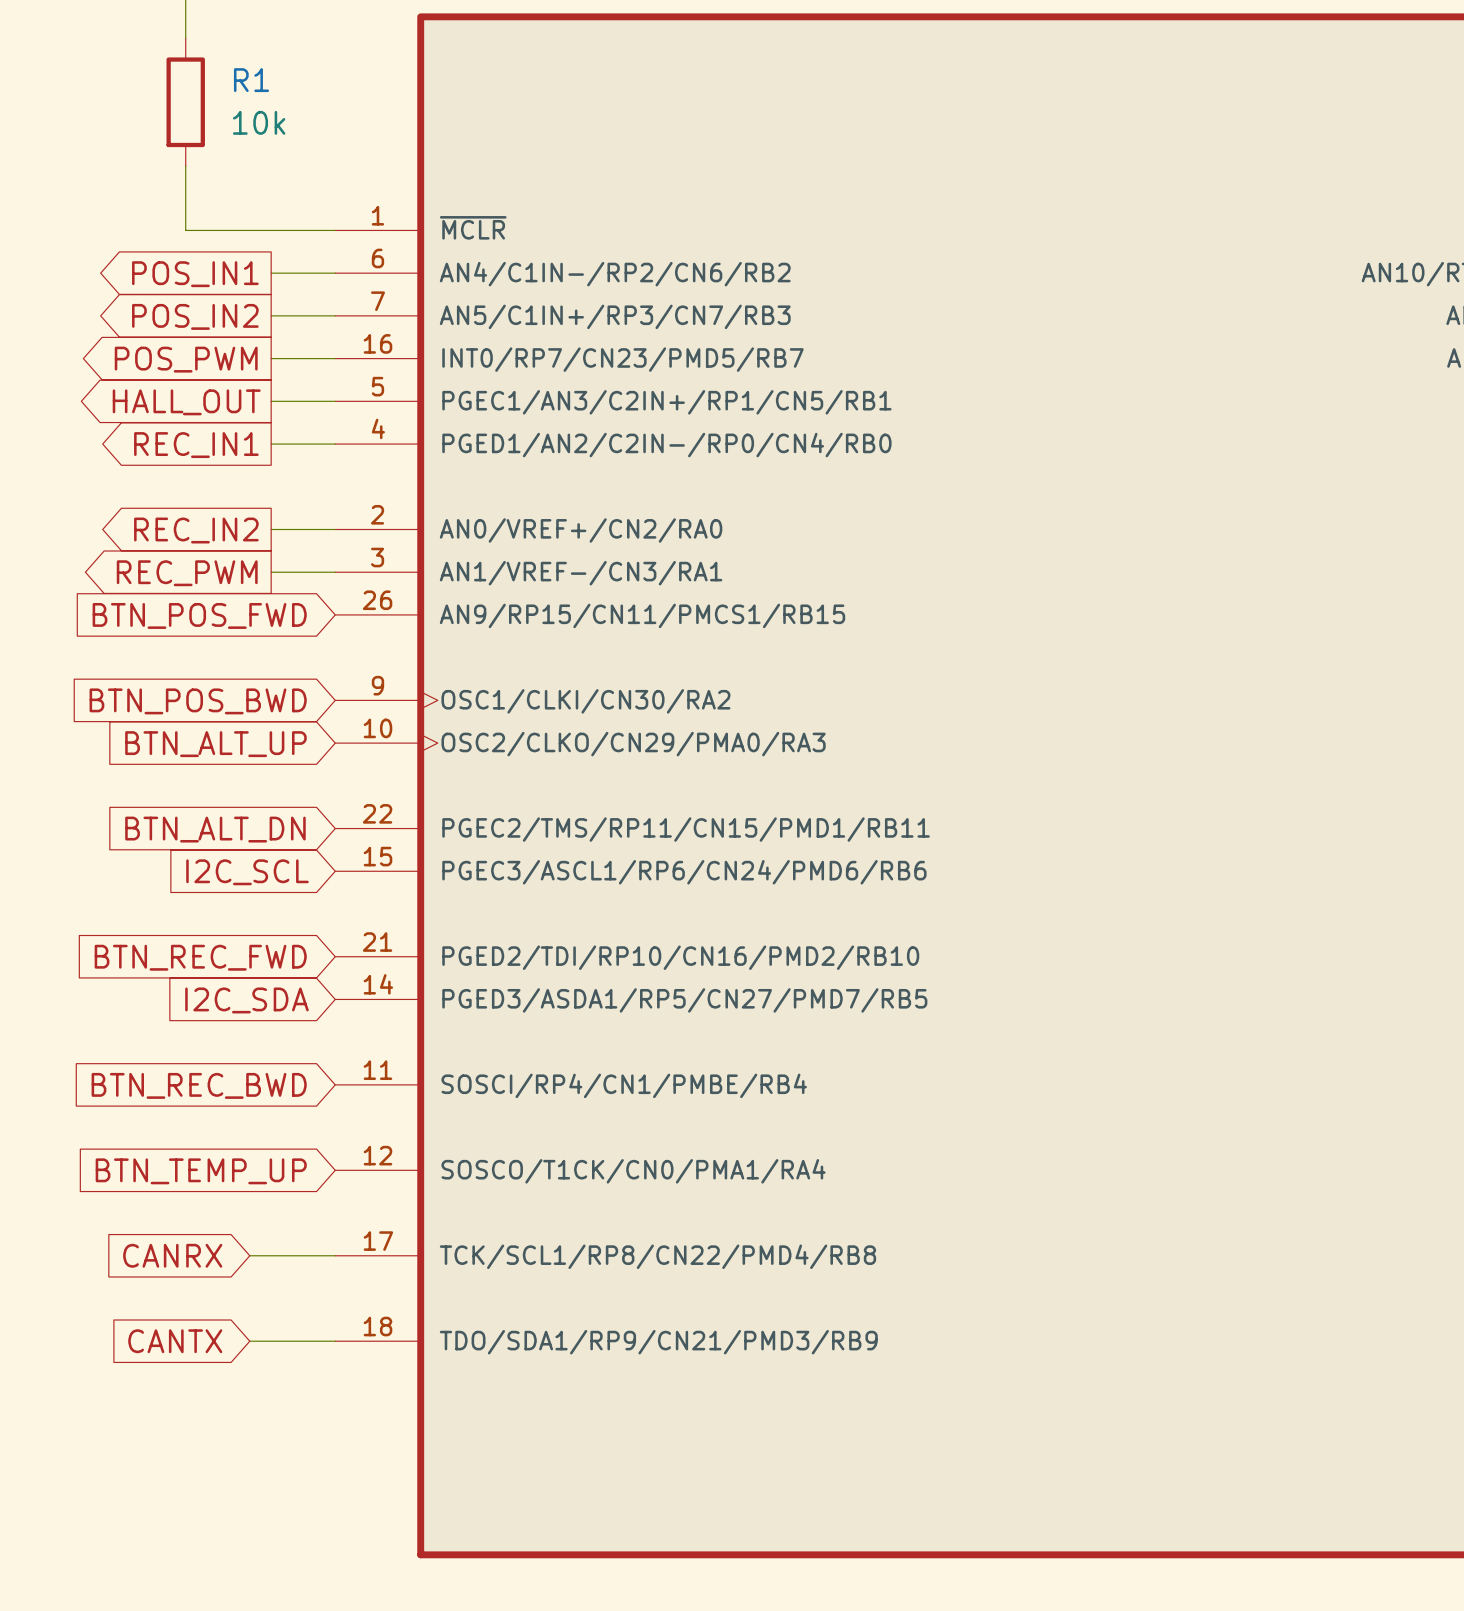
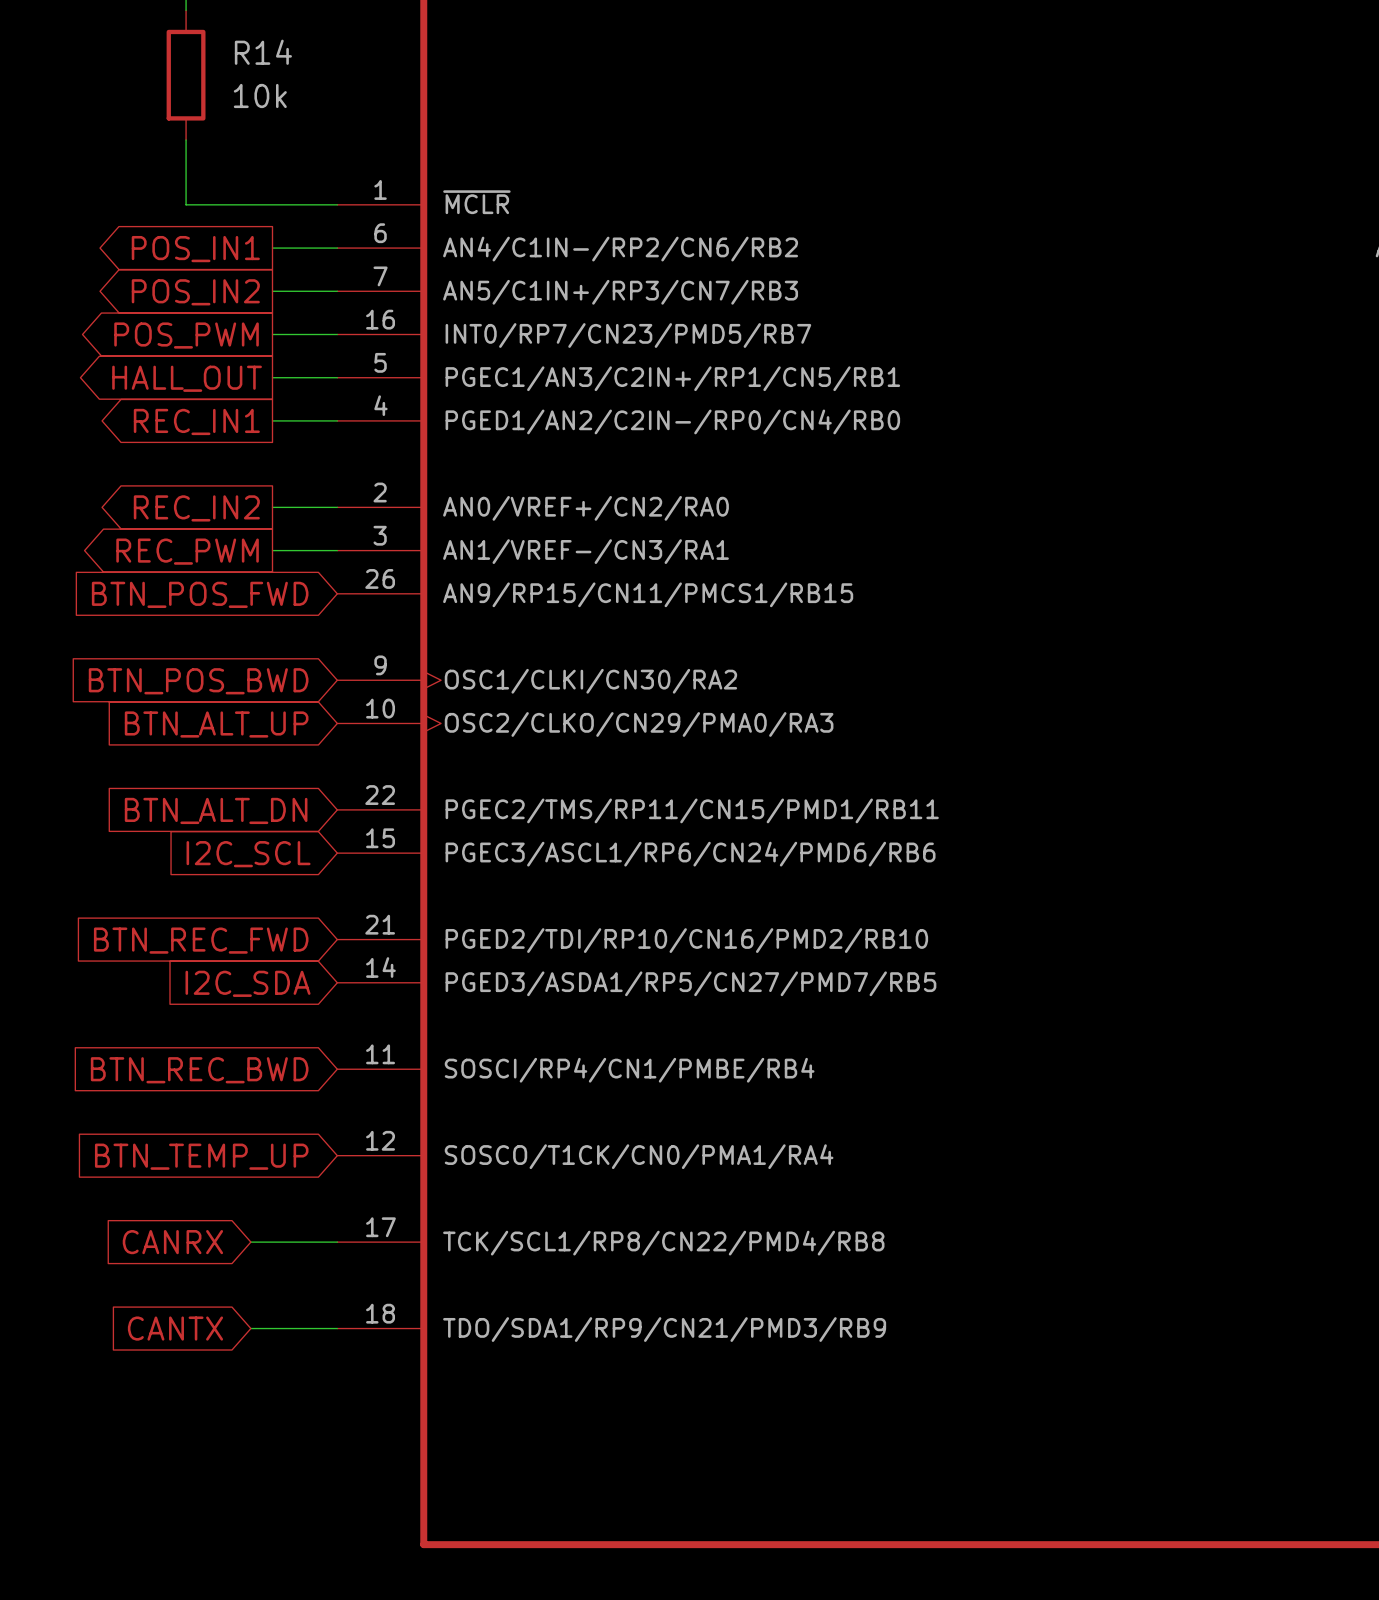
R1 name: R1 (251, 80) -> R14 (263, 52)

